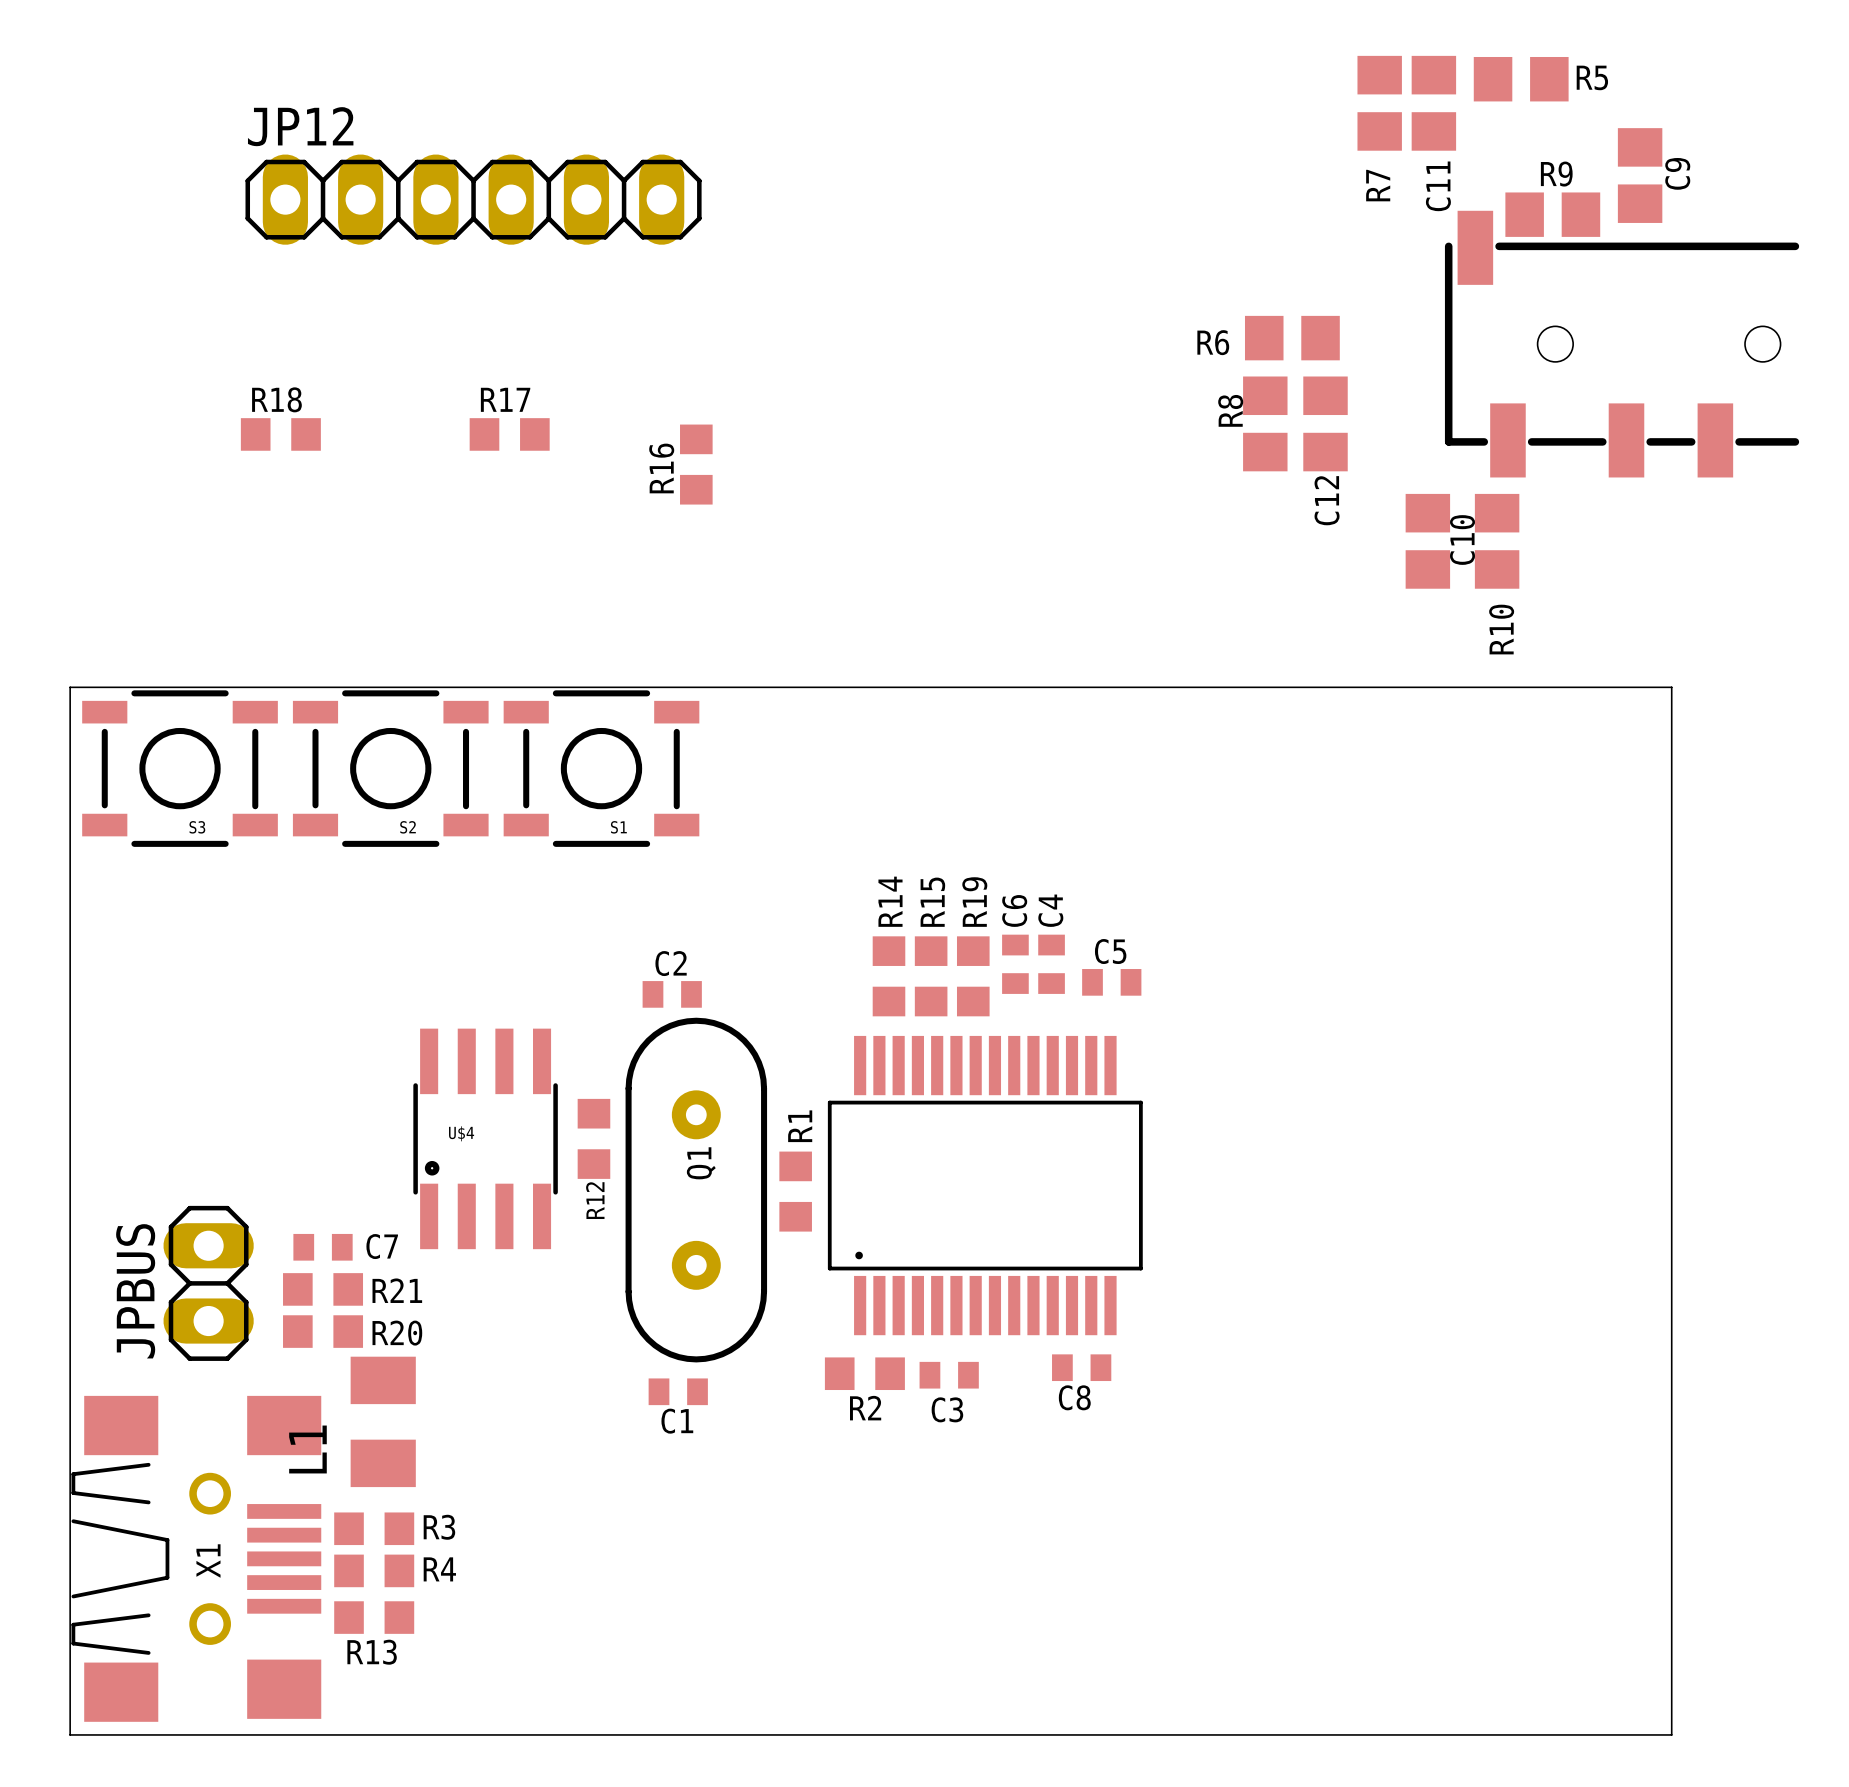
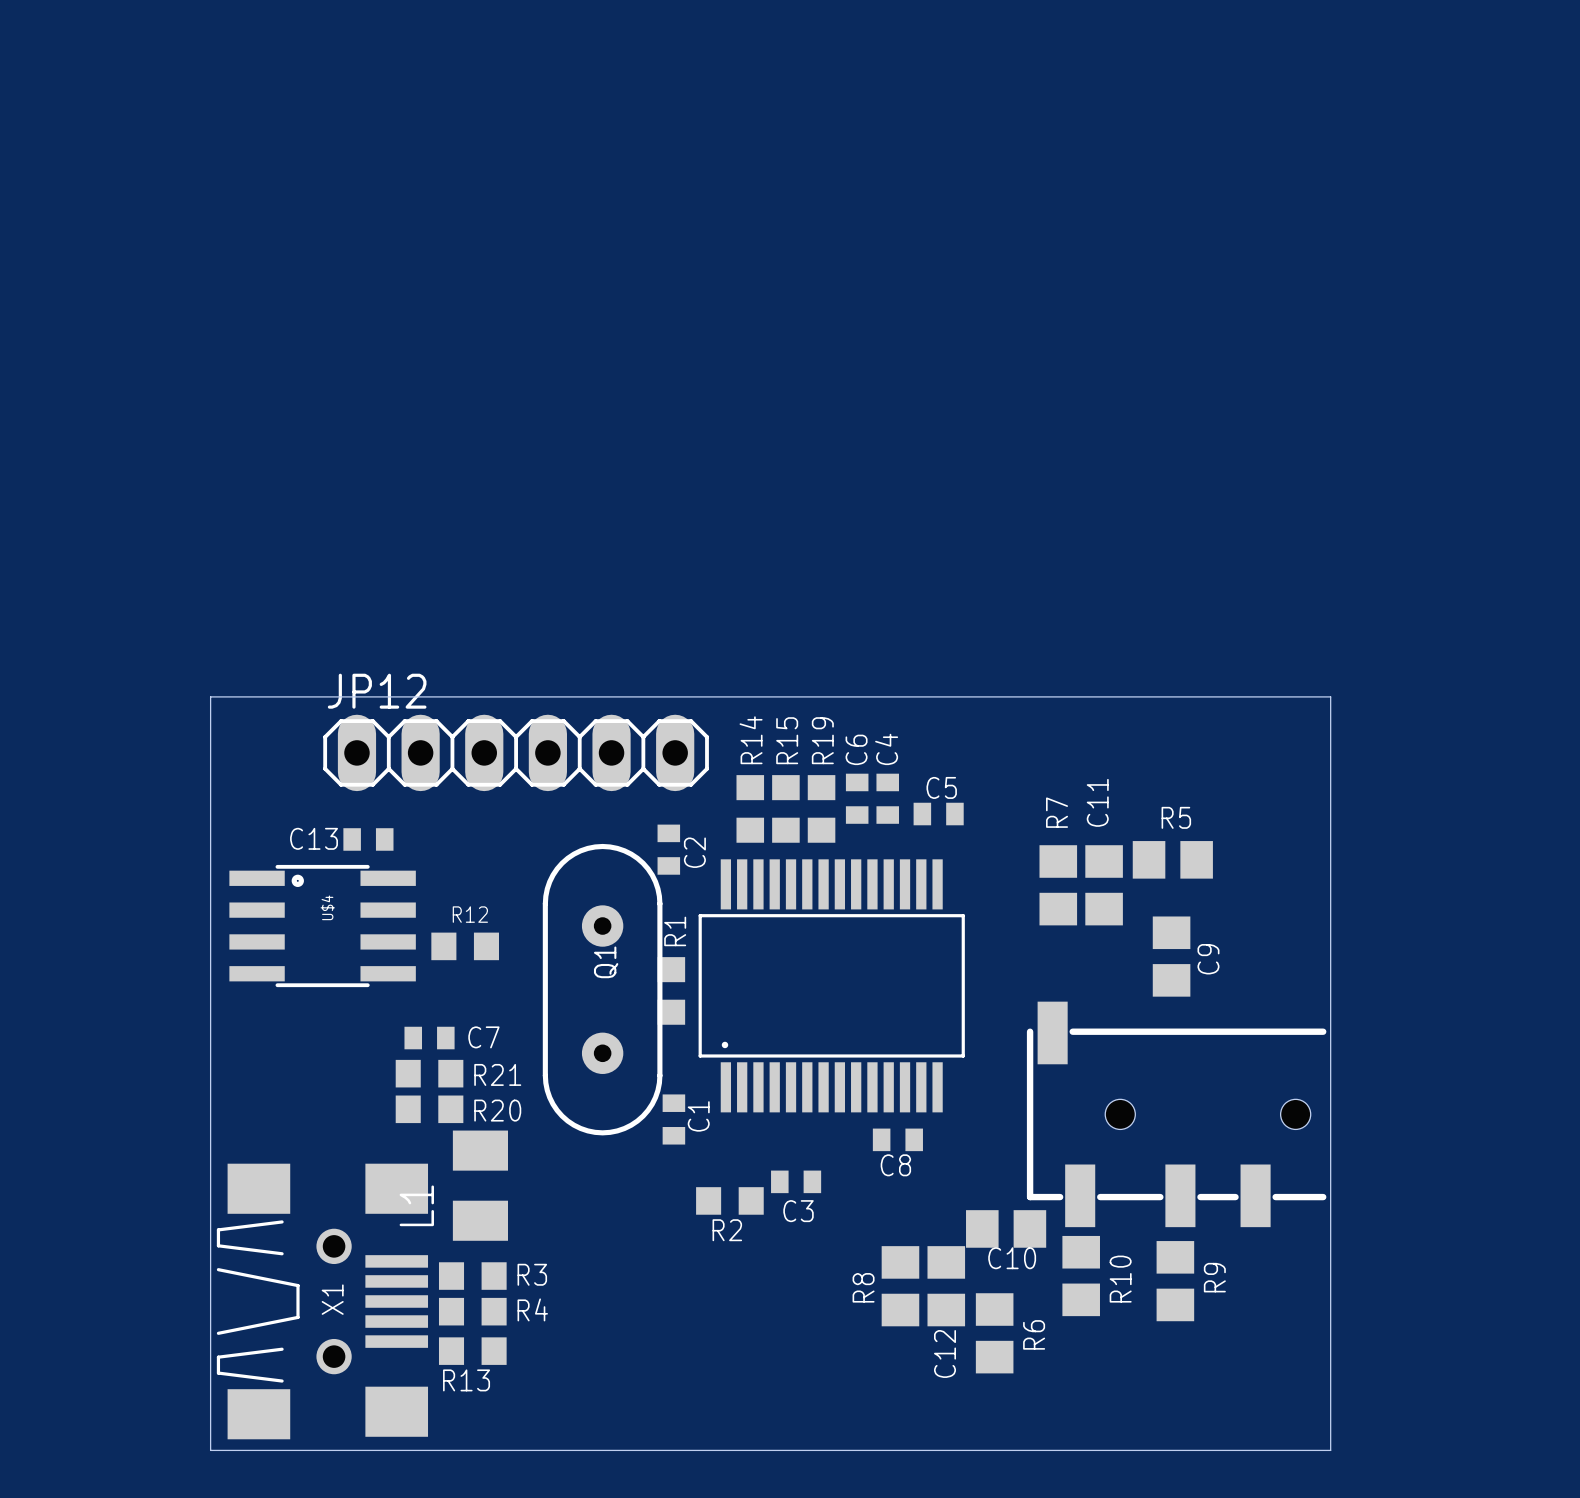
R5 name position: R5 (1592, 77) -> R5 (1176, 817)
R5 position: (1521, 79) -> (1172, 859)
R7 position: (1379, 103) -> (1058, 885)
C11 position: (1433, 103) -> (1104, 885)
C9 name position: C9 (1677, 173) -> C9 (1208, 959)
C9 position: (1640, 175) -> (1171, 956)
R7 name position: R7 (1378, 185) -> R7 (1057, 812)
C11 name position: C11 (1438, 186) -> C11 (1097, 802)
JP12 position: (473, 199) -> (516, 752)
R9 rotation: 0° (1552, 214) -> 90° clockwise (1175, 1281)
R9 position: (1552, 214) -> (1175, 1281)
R6 rotation: 0° (1292, 338) -> 90° clockwise (994, 1333)
R6 position: (1292, 338) -> (994, 1333)
R6 name position: R6 (1213, 342) -> R6 (1034, 1334)
part: (1622, 344) -> none
R8 name position: R8 (1230, 410) -> R8 (863, 1287)
R8 position: (1265, 423) -> (900, 1286)
C12 position: (1325, 423) -> (946, 1286)
R18: (280, 434) -> none
R17: (509, 434) -> none
R16: (696, 464) -> none
C12 name position: C12 (1327, 500) -> C12 (945, 1353)
C10 rotation: 0° (1427, 541) -> 90° clockwise (1006, 1228)
C10 position: (1427, 541) -> (1006, 1228)
R10 position: (1497, 541) -> (1081, 1276)
R10 name position: R10 (1501, 629) -> R10 (1120, 1279)
S3: (180, 768) -> none
S2: (390, 768) -> none
S1: (601, 768) -> none
C2 rotation: 0° (672, 994) -> 90° clockwise (668, 849)
C2 position: (672, 994) -> (668, 849)
C13: none -> (368, 839)
U$4 rotation: 0° (485, 1138) -> 90° clockwise (322, 926)
R12 rotation: 0° (593, 1138) -> 90° clockwise (465, 946)
Q1 position: (696, 1190) -> (602, 989)
R12 name position: R12 (595, 1200) -> R12 (470, 914)
C7 position: (323, 1247) -> (429, 1038)
JPBUS: (208, 1283) -> none
R21 position: (323, 1289) -> (429, 1073)
R20 position: (323, 1331) -> (429, 1109)
part: none -> (1176, 1114)
C8 position: (1081, 1367) -> (897, 1139)
R2 position: (864, 1373) -> (729, 1200)
C3 position: (949, 1375) -> (796, 1181)
C1 rotation: 0° (678, 1391) -> 90° clockwise (673, 1119)
C1 position: (678, 1391) -> (673, 1119)
L1 position: (383, 1421) -> (480, 1185)
R3 position: (374, 1528) -> (472, 1276)
X1 position: (196, 1558) -> (322, 1301)
R4 position: (374, 1570) -> (472, 1311)
R13 position: (374, 1617) -> (472, 1351)
board edge: (250, 1734) (70, 1734) (70, 687) (1671, 687) (1671, 1734) (1575, 1734) -> (210, 1450) (210, 696) (1330, 696) (1330, 1450)

